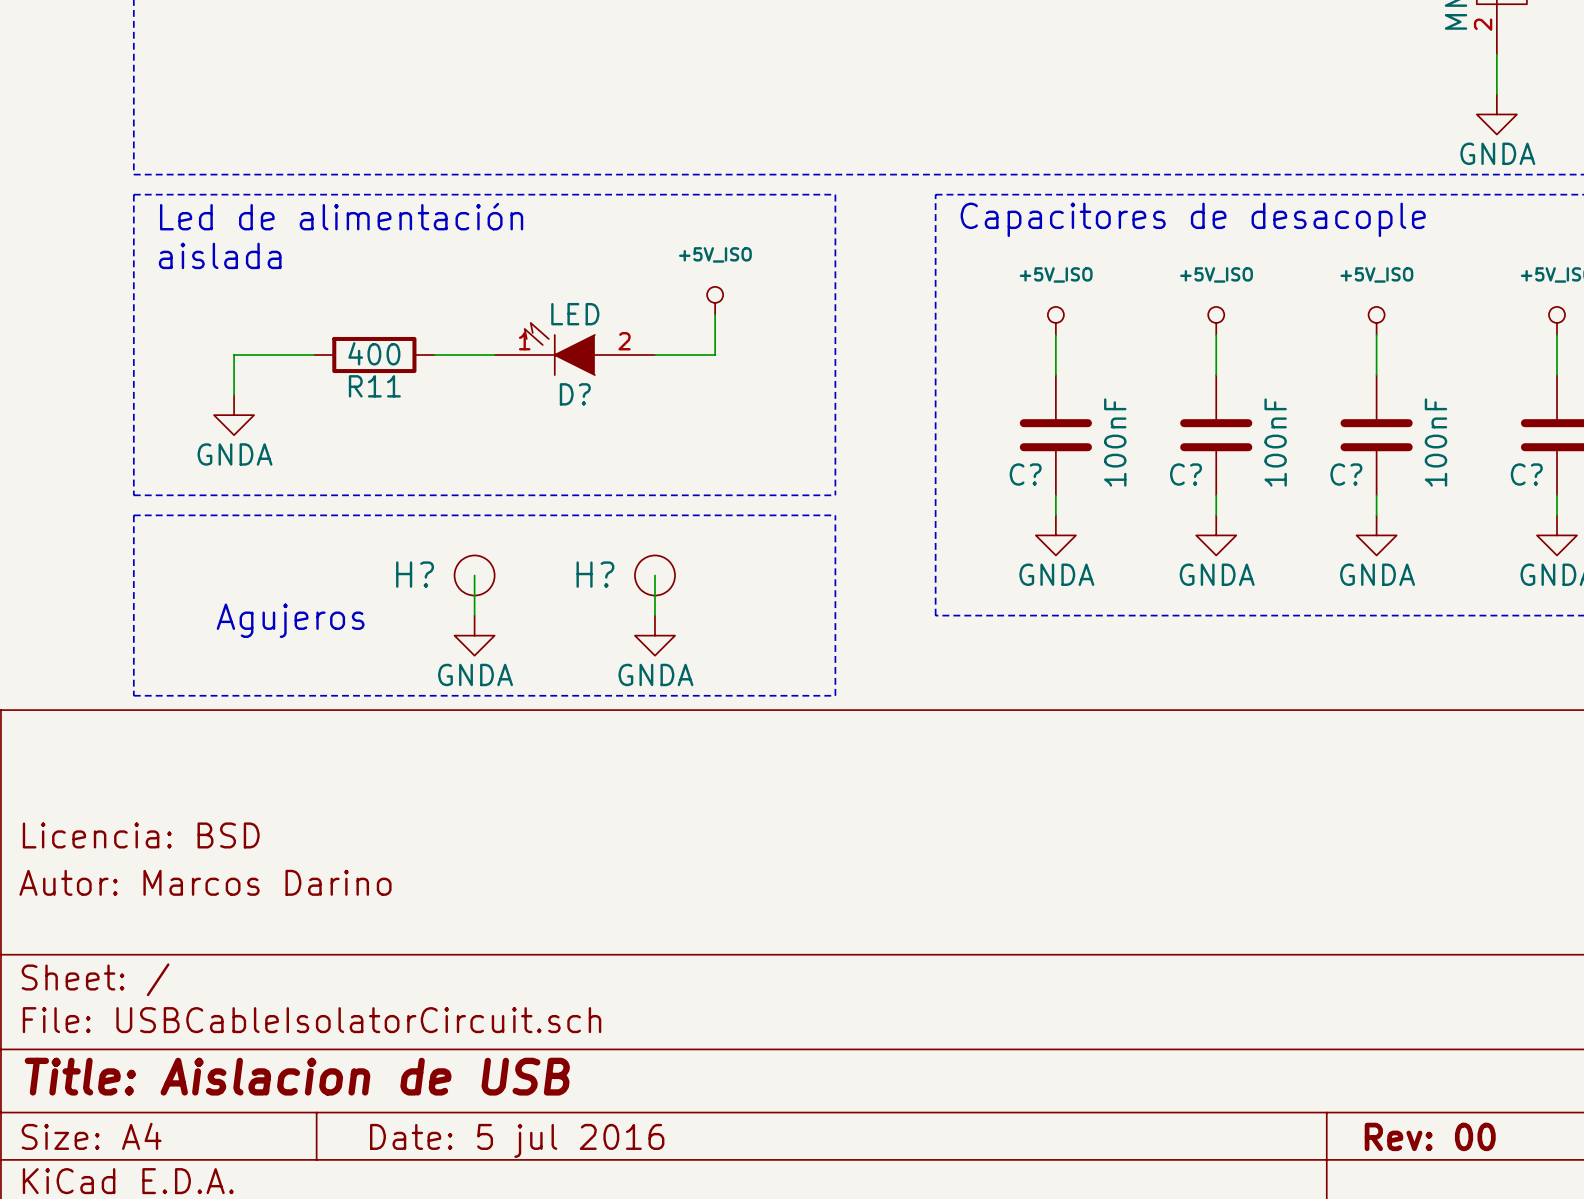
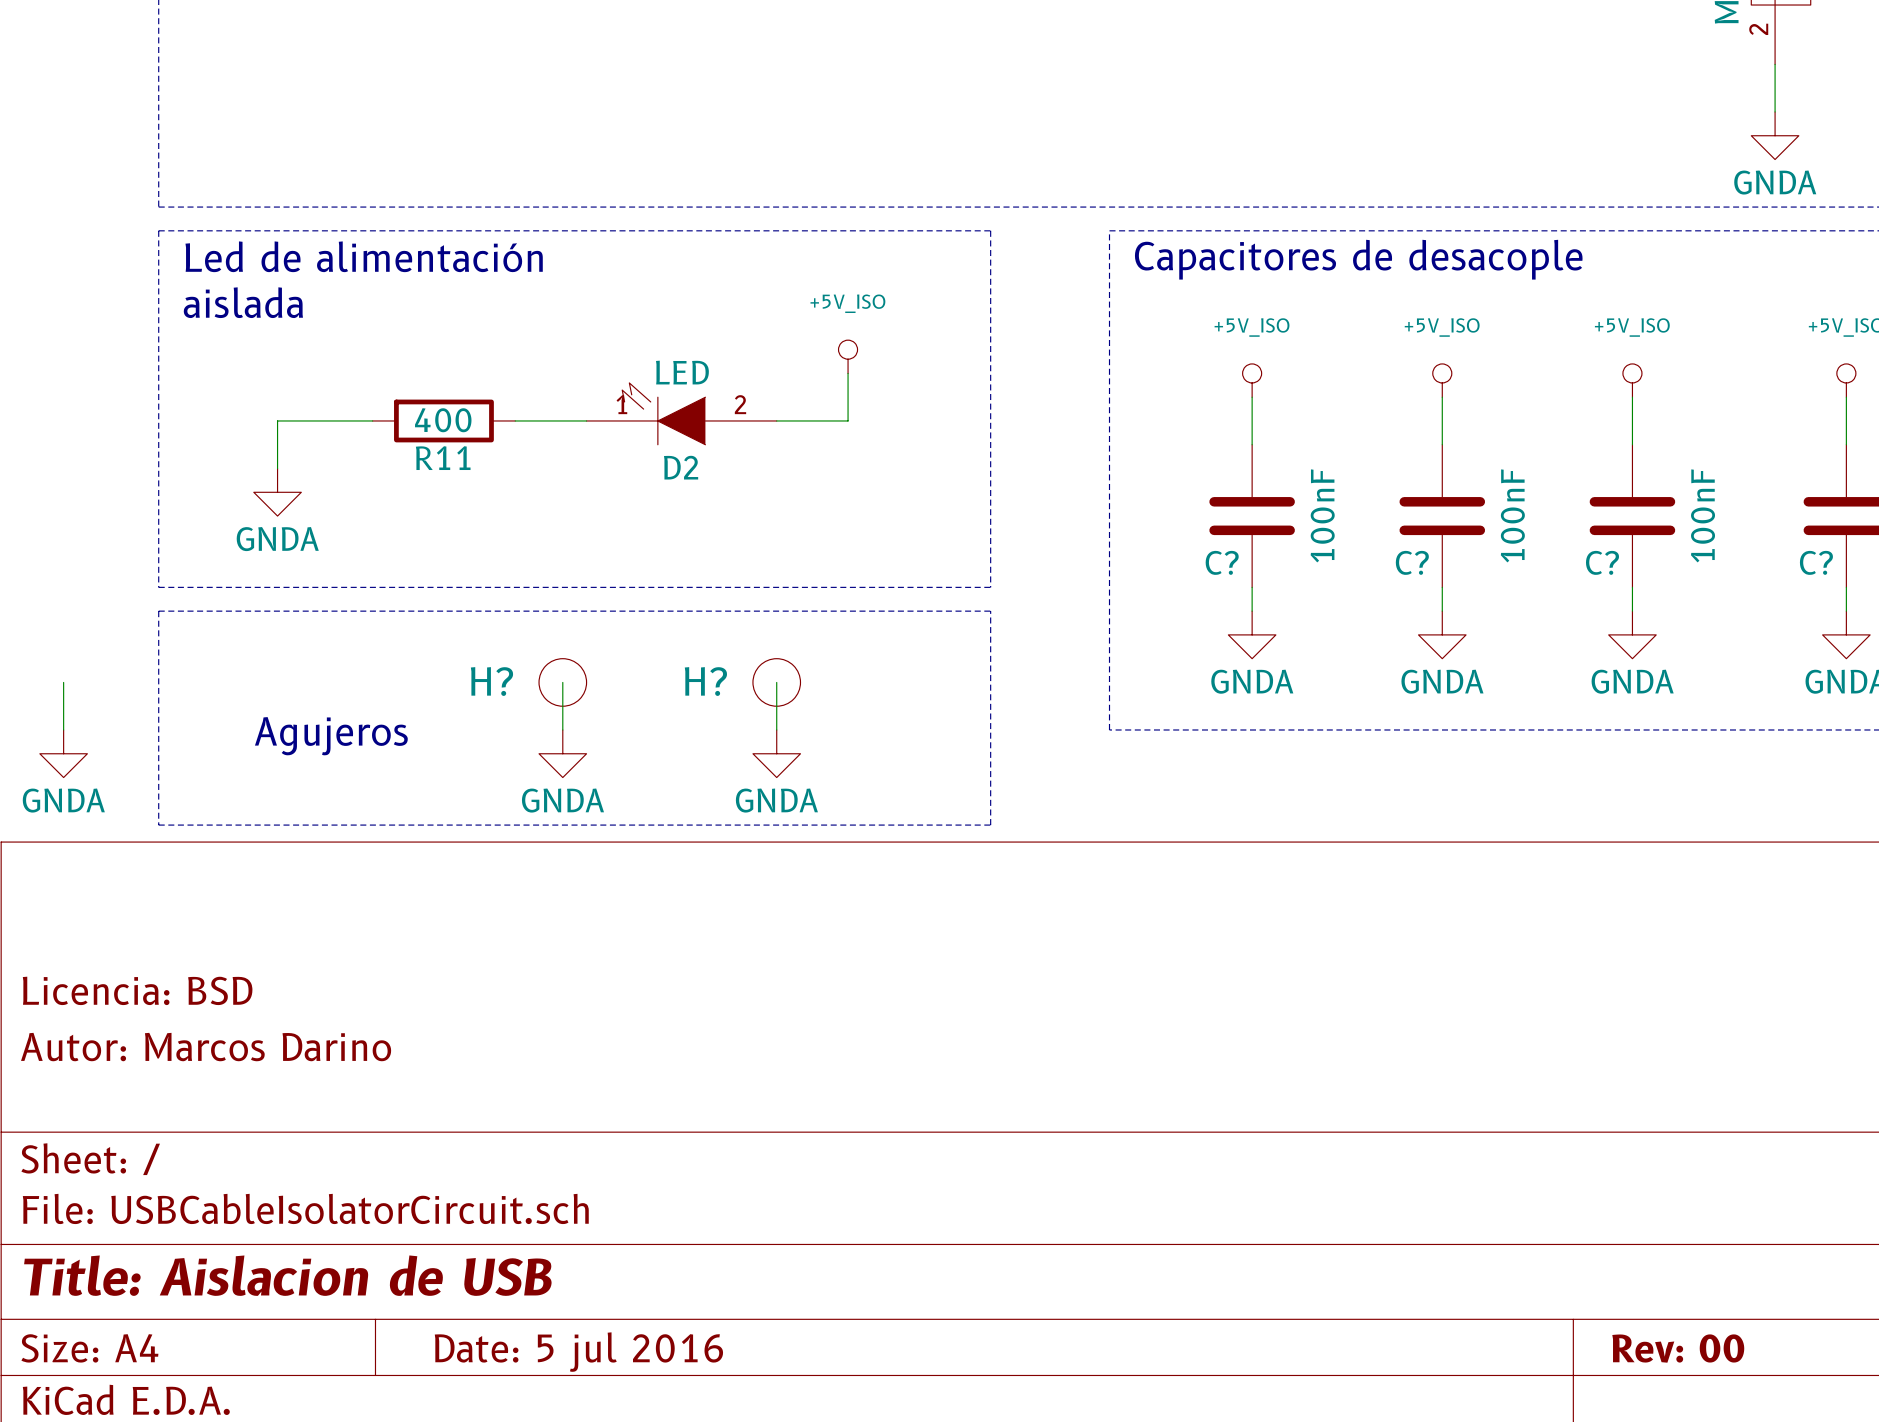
D? name: D? (575, 394) -> D2 (681, 467)
wire: none -> (63, 682) (63, 729)
power symbol: none -> GNDA (63, 753)

